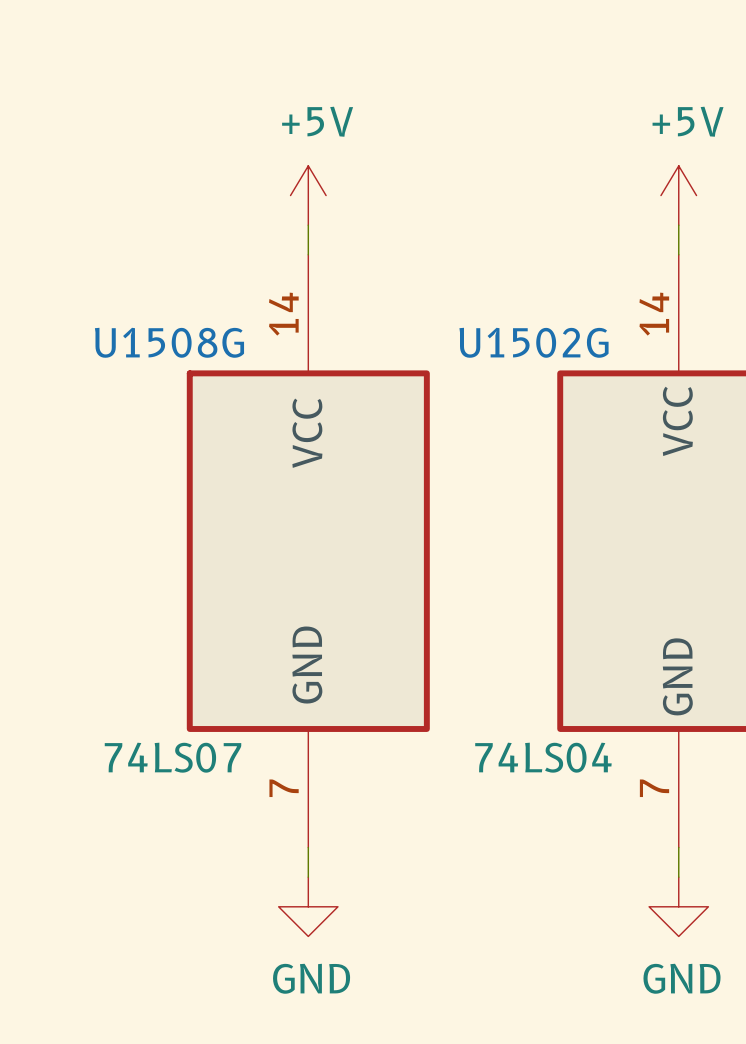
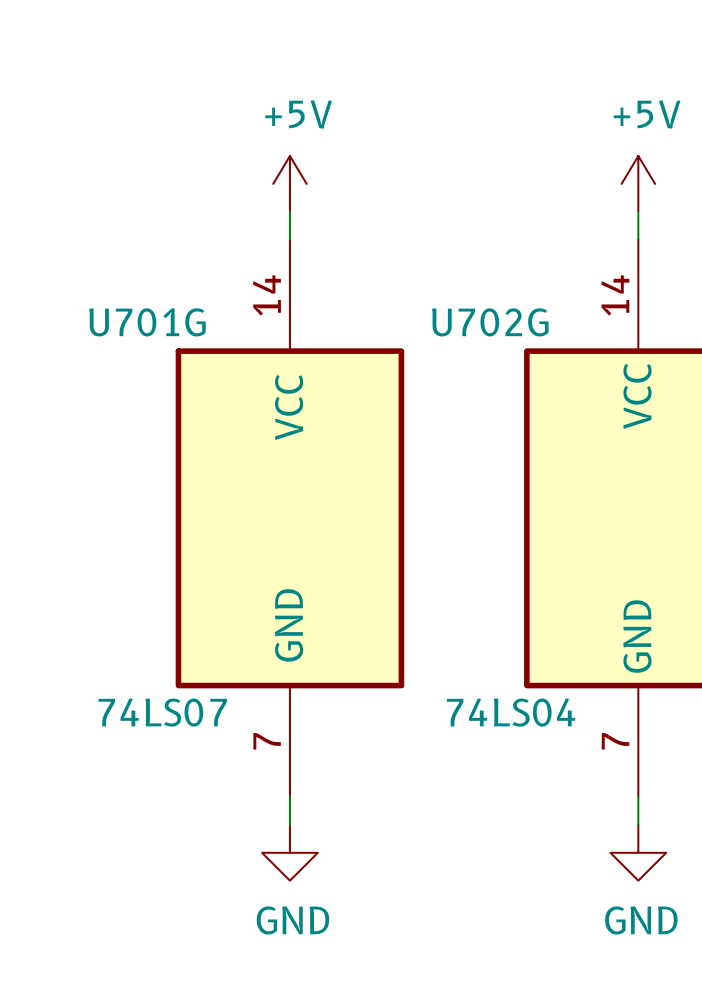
U1508G name: U1508G (169, 342) -> U701G (147, 322)
U1502G name: U1502G (533, 342) -> U702G (490, 322)

